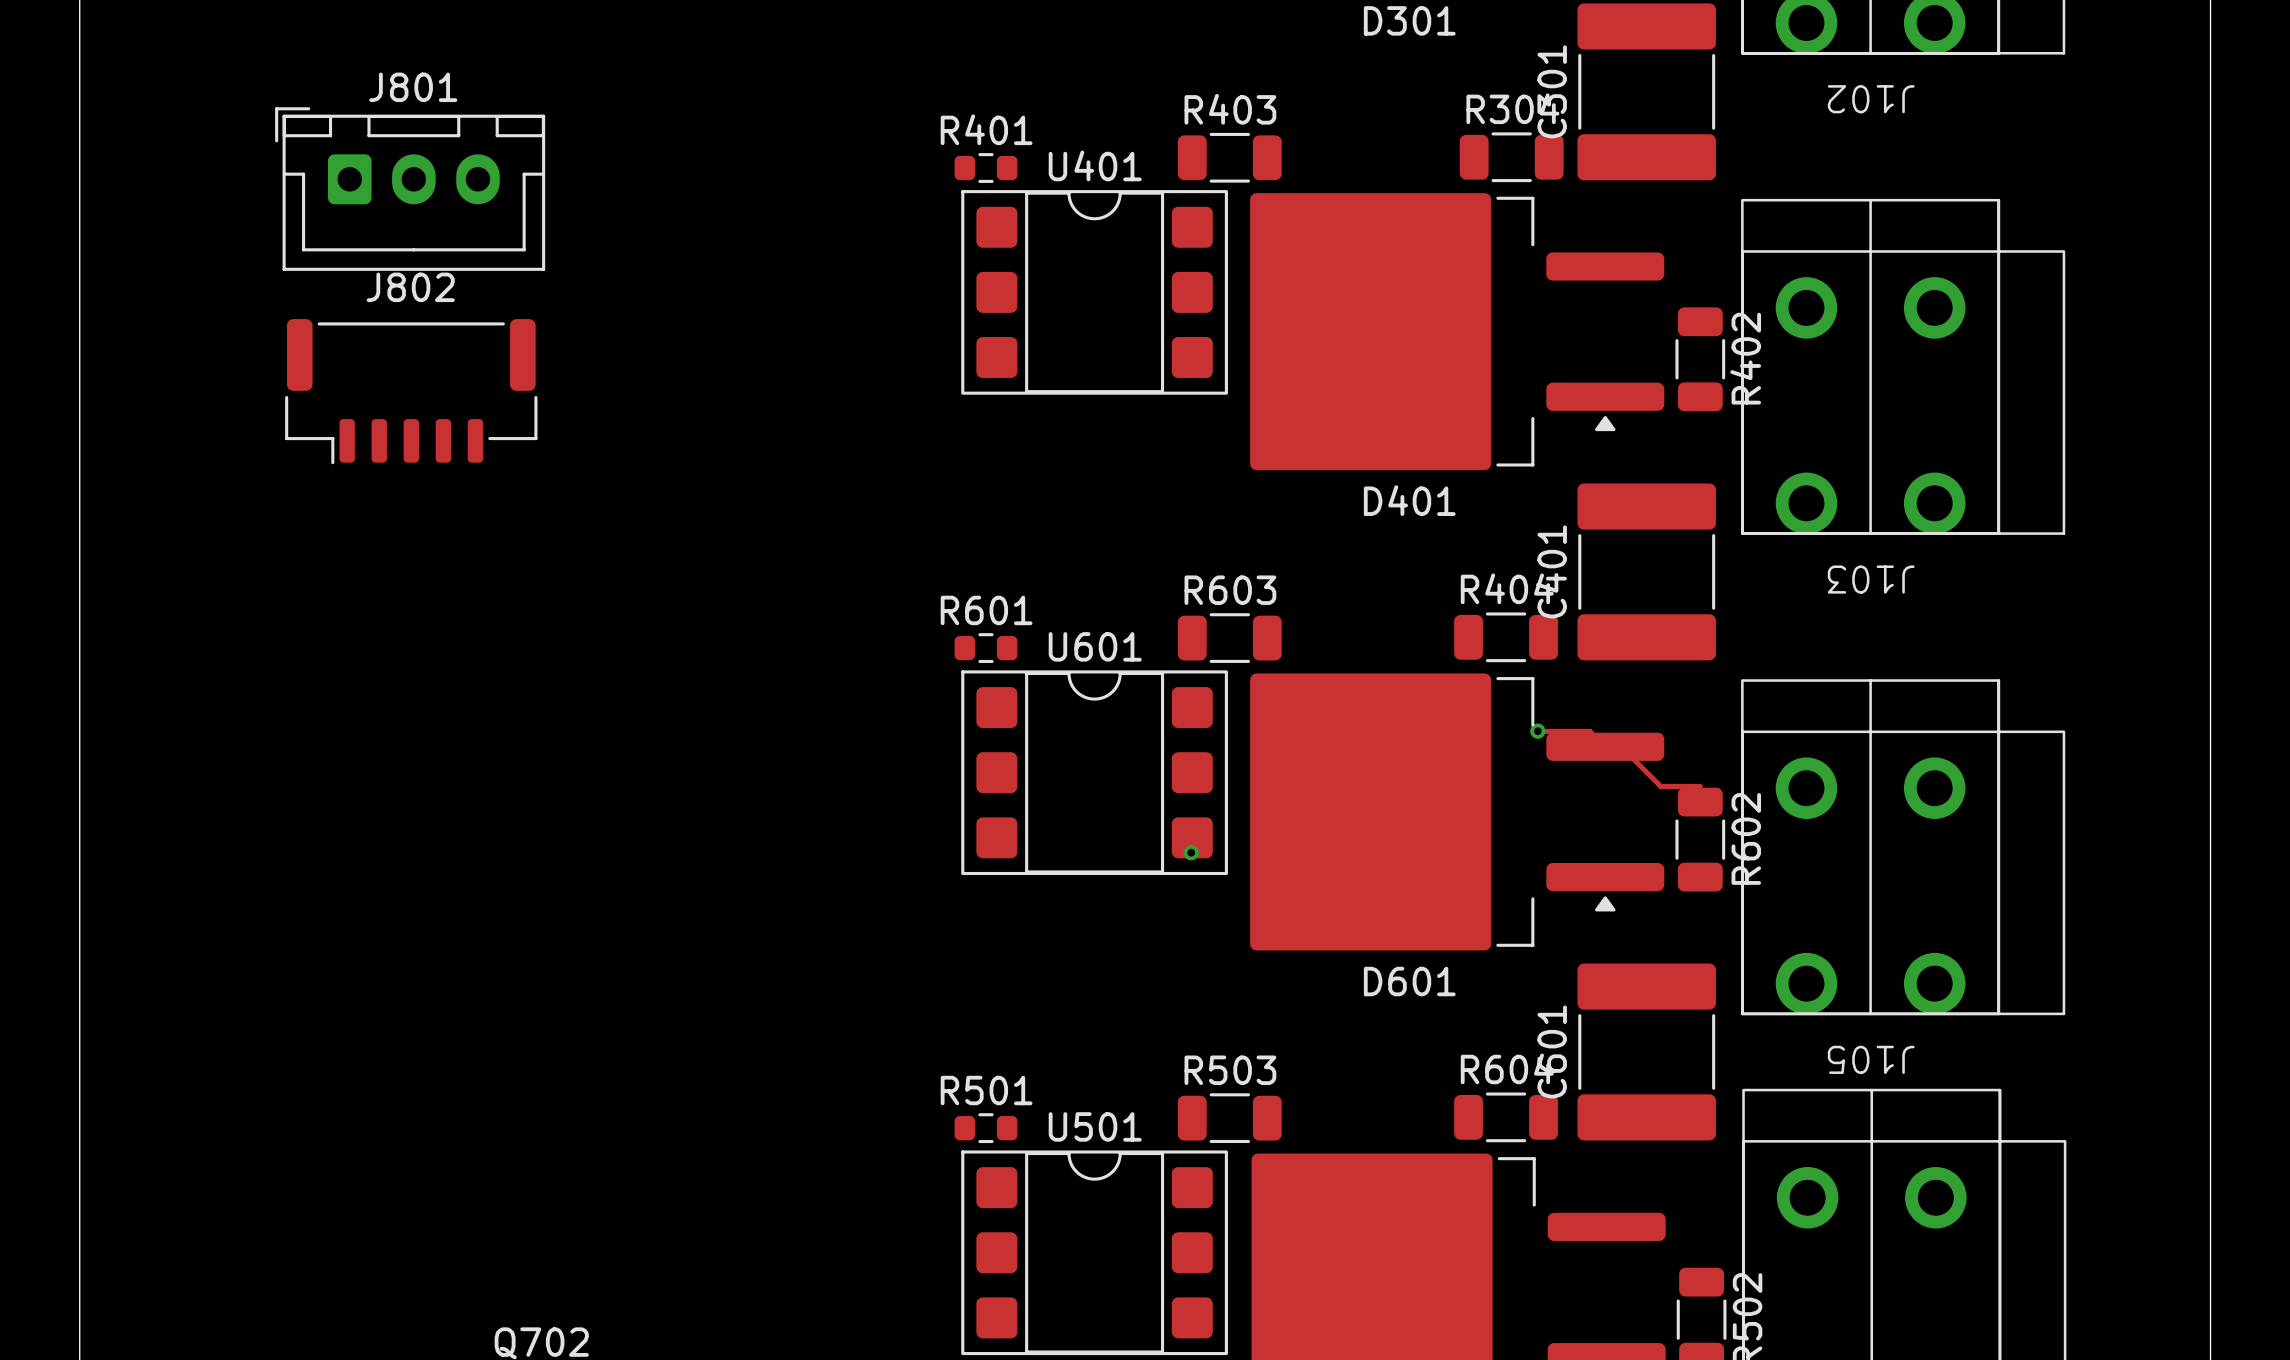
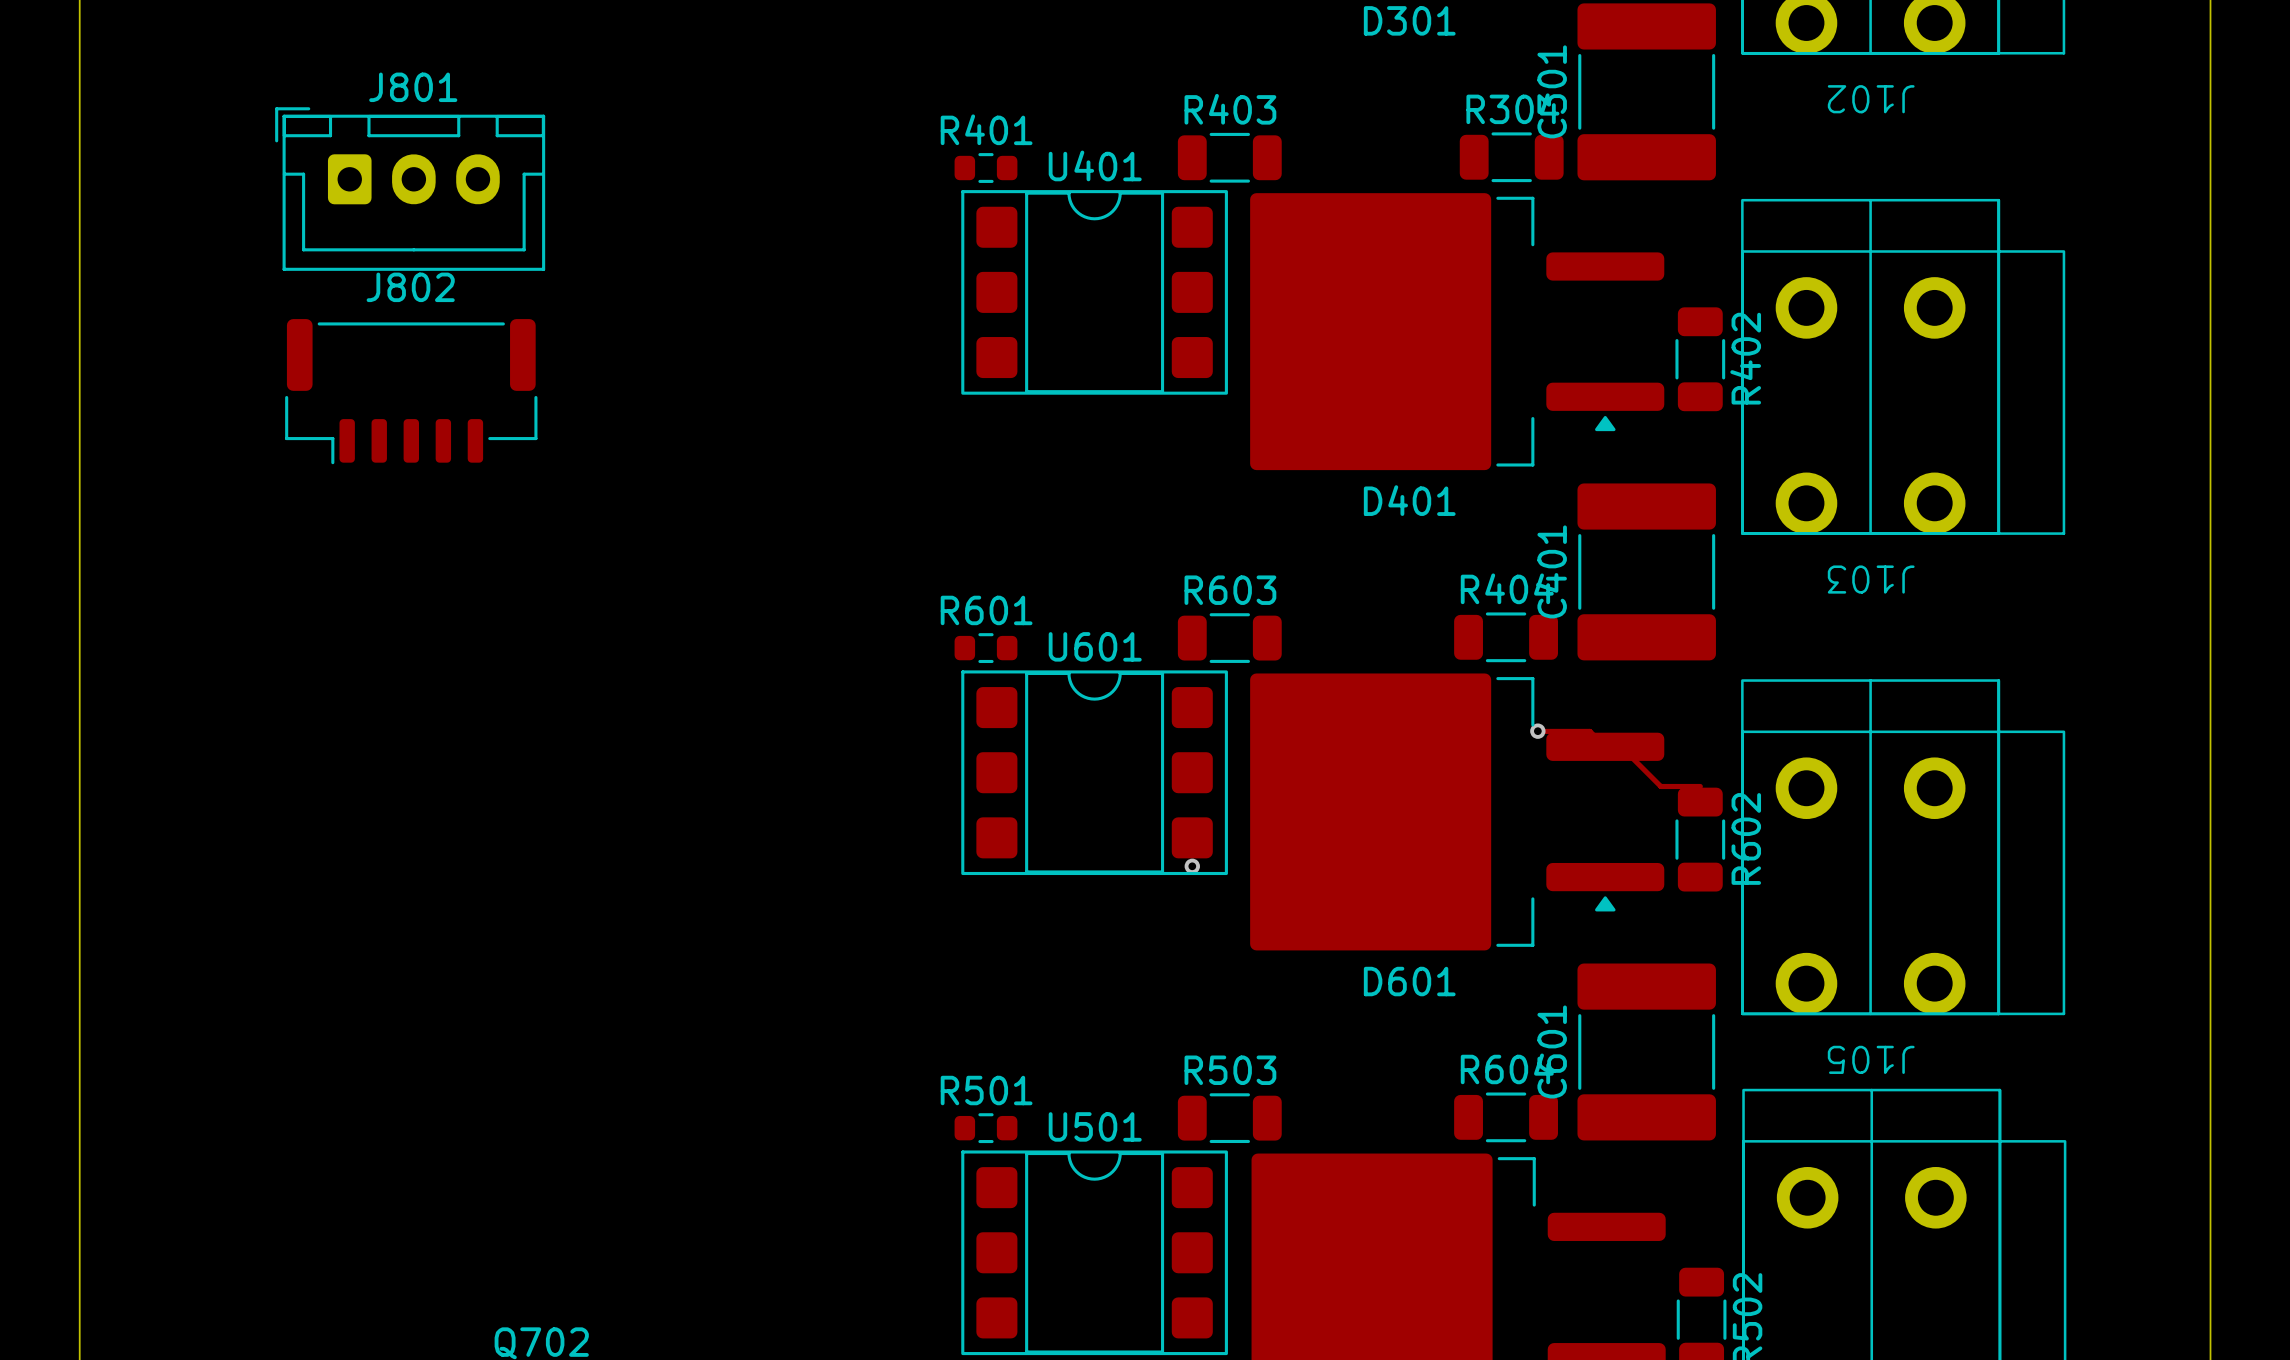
via position: (1191, 852) -> (1192, 866)

